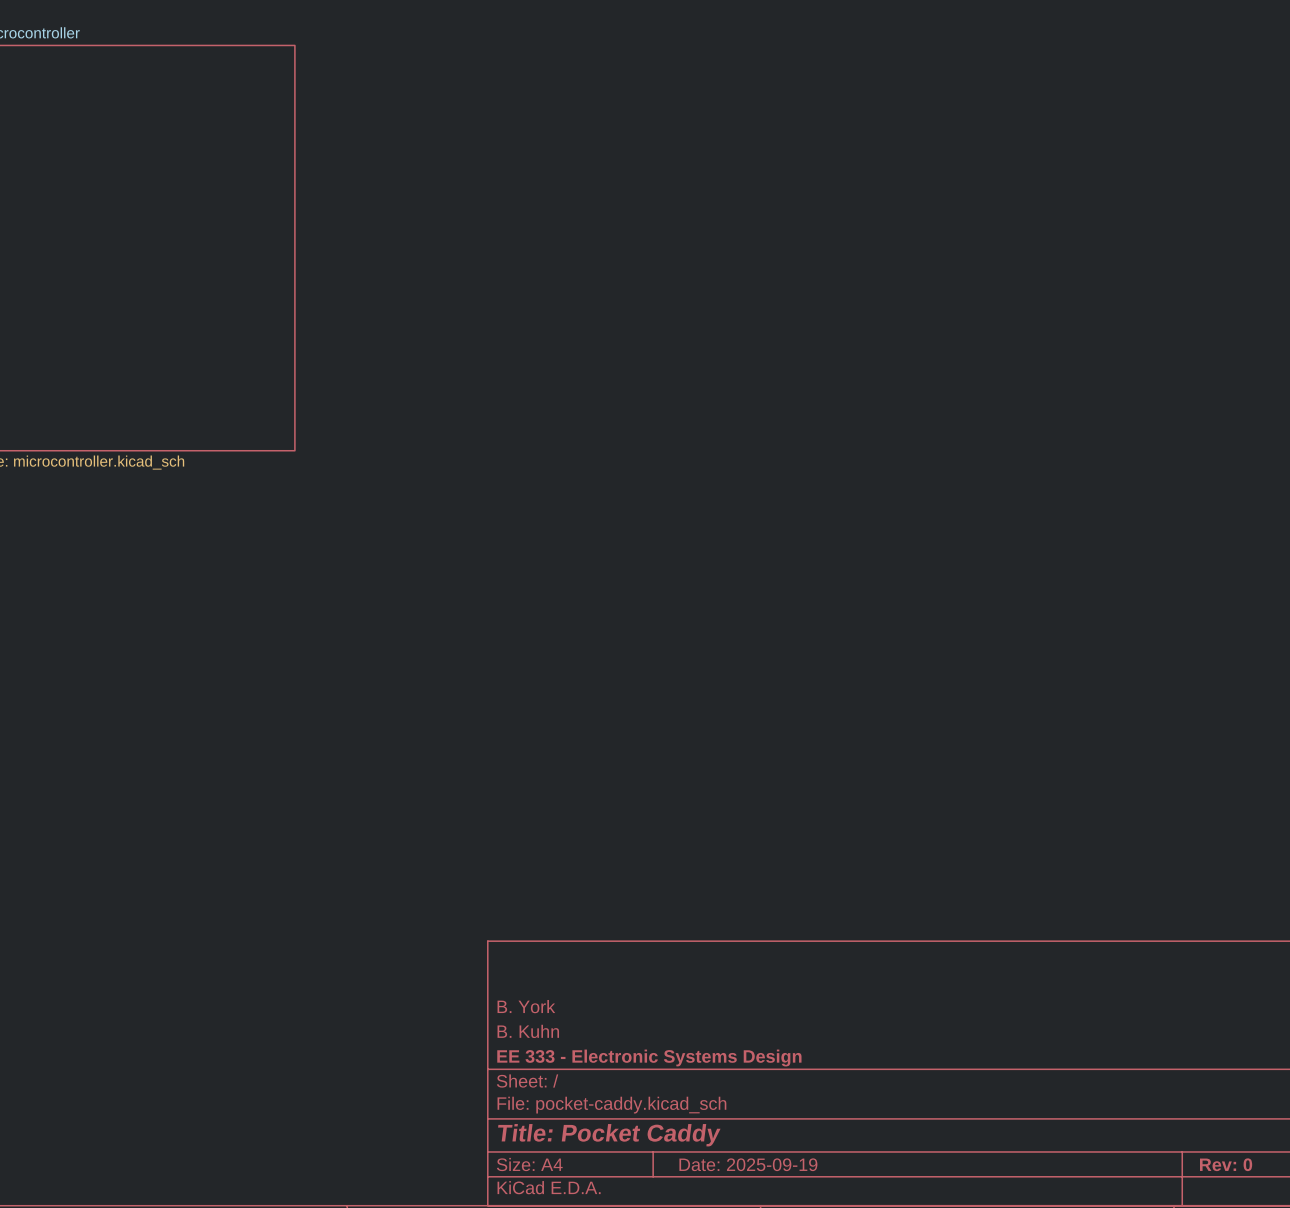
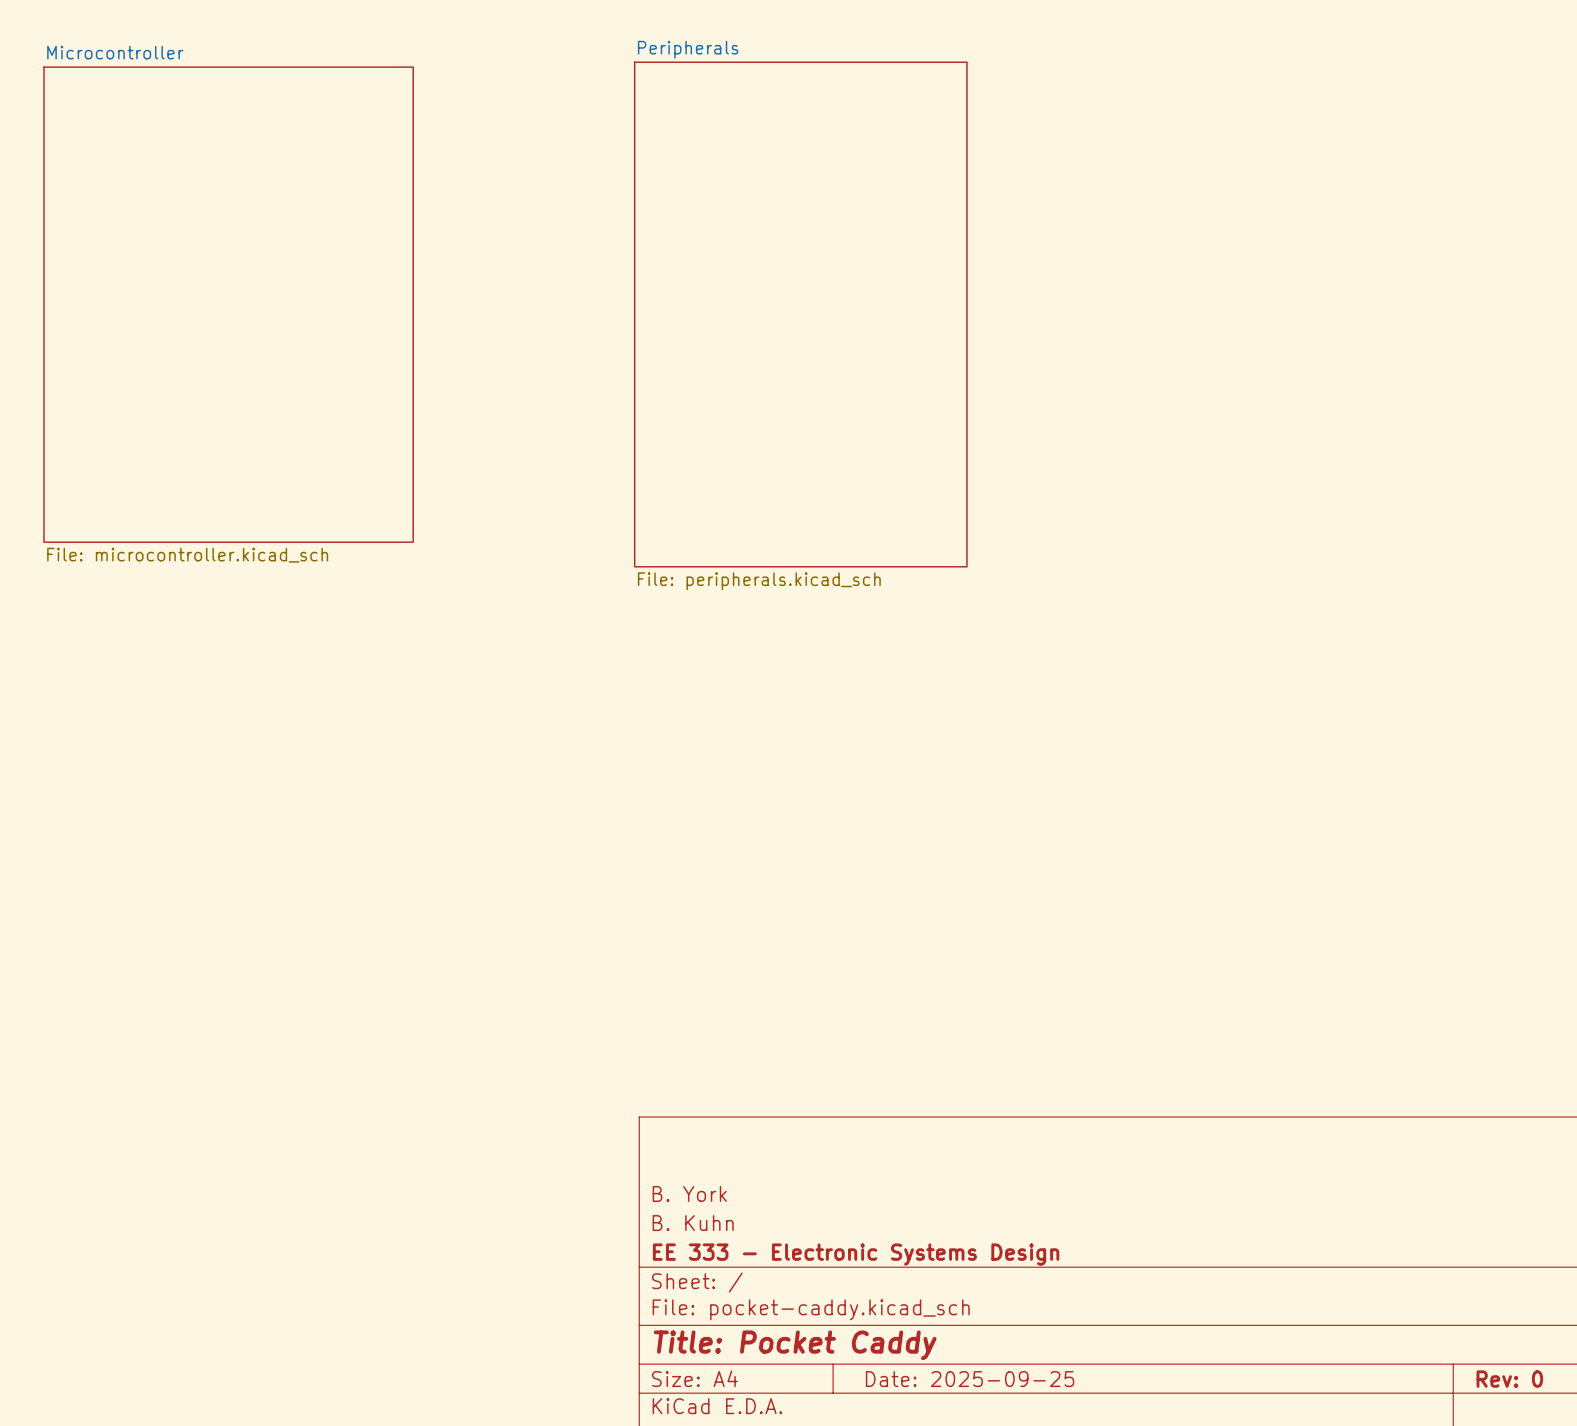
sheet Peripherals: none -> File: peripherals.kicad_sch (800, 314)
title block: Date: 2025-09-19 (748, 1164) -> Date: 2025-09-25 (970, 1379)

